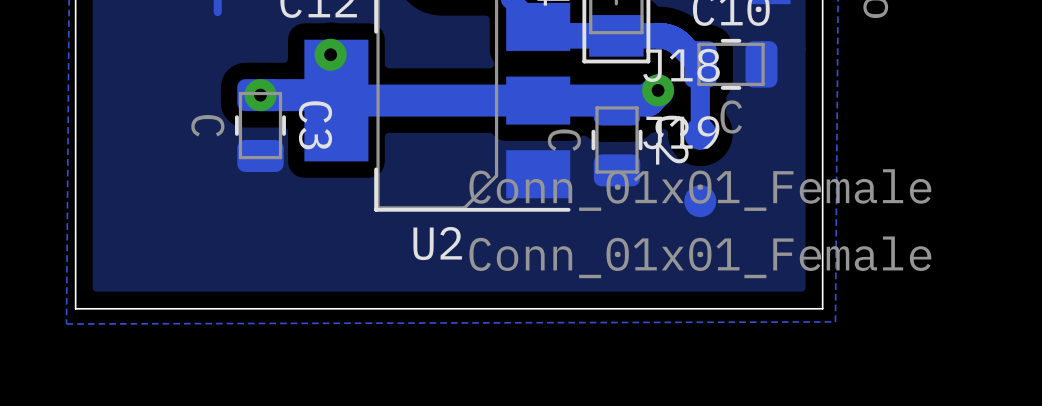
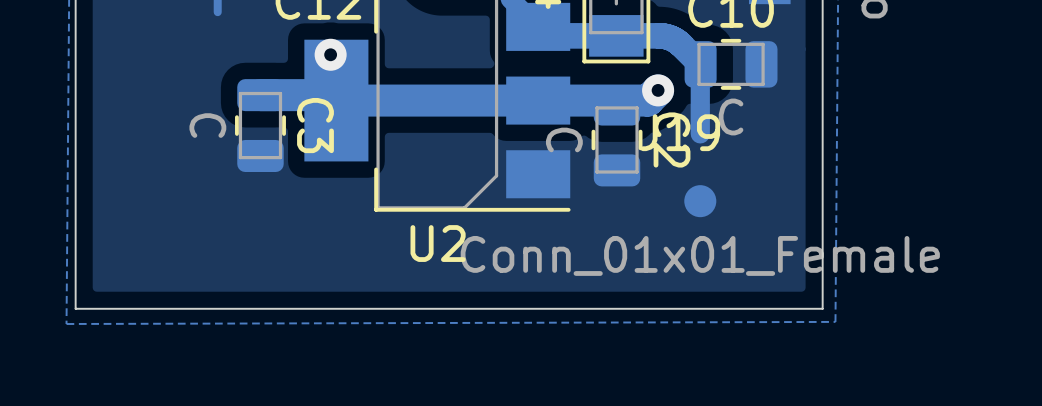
via: (260, 95) -> none
J18: Conn_01x01_Female (700, 133) -> none

